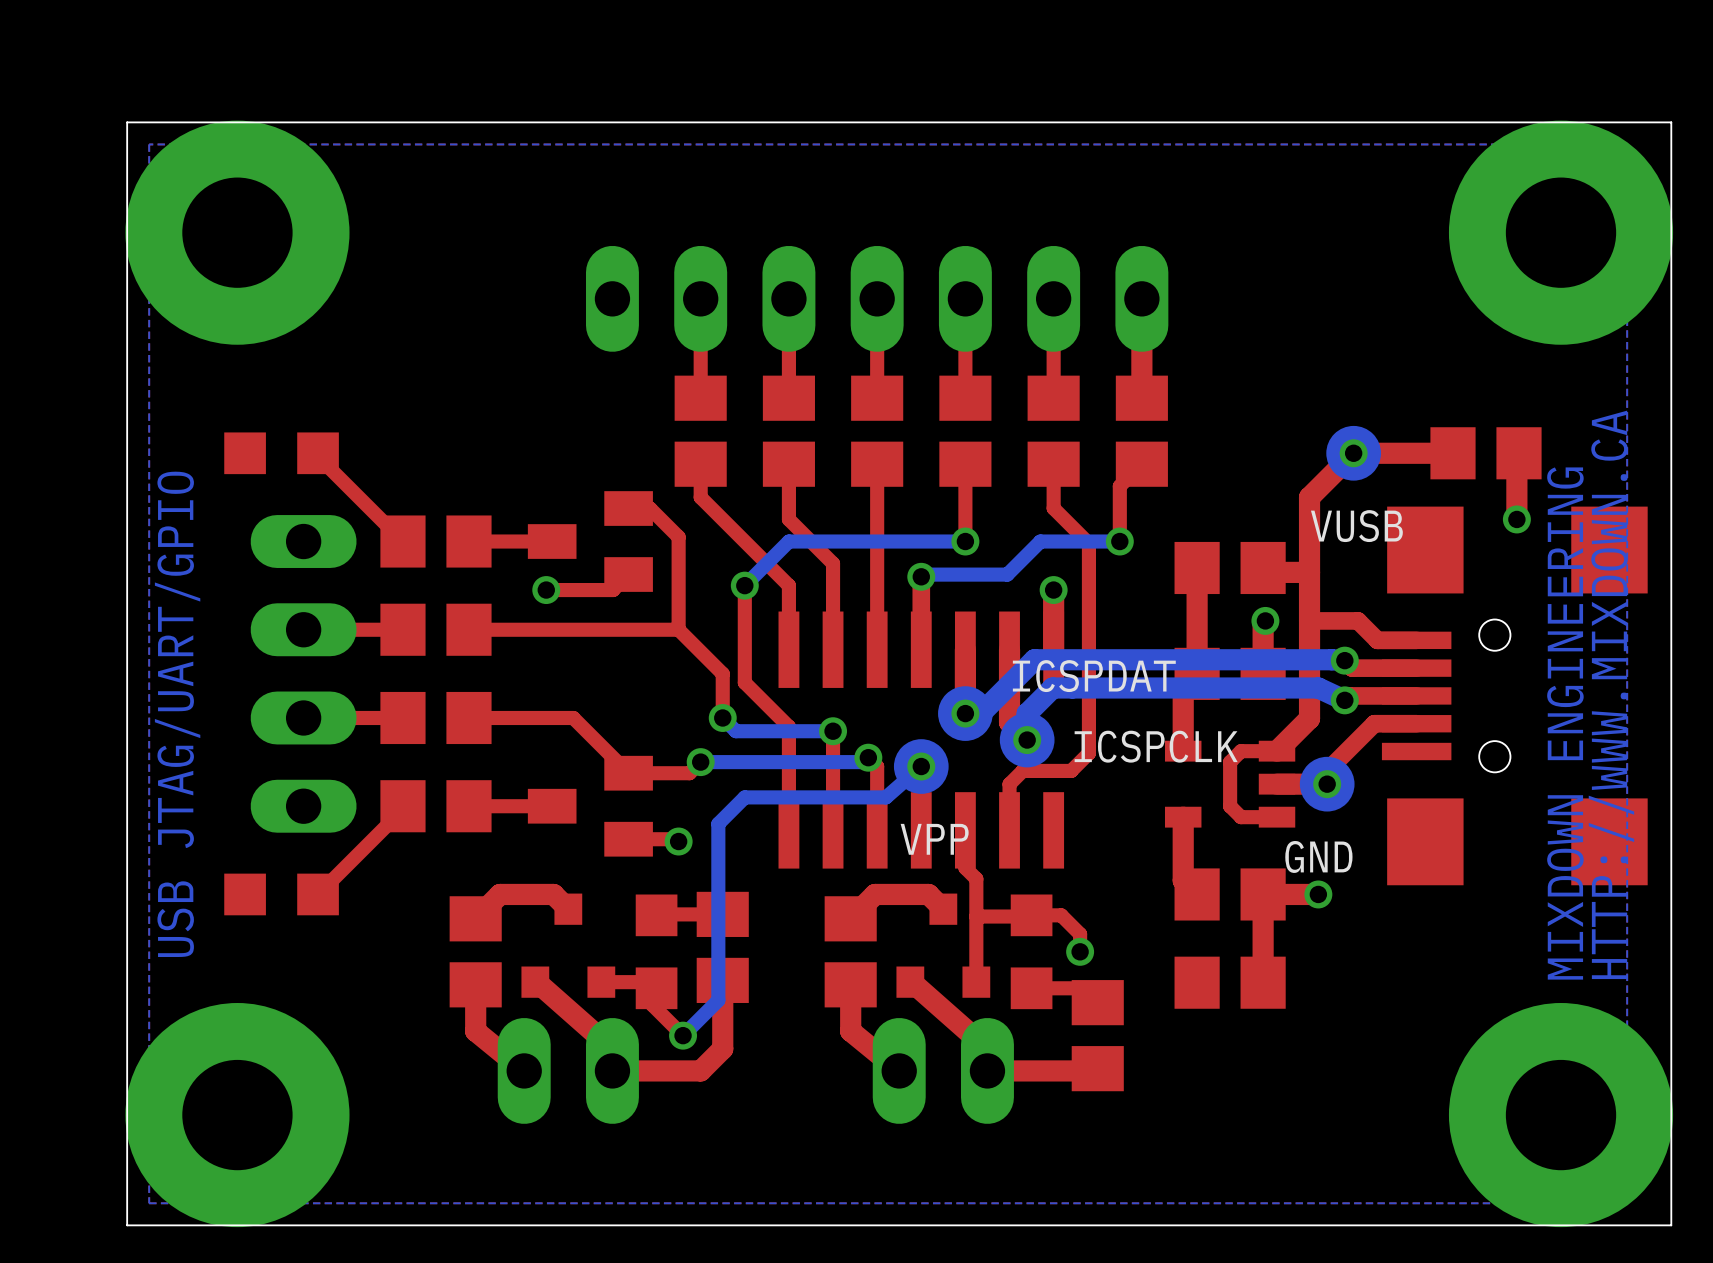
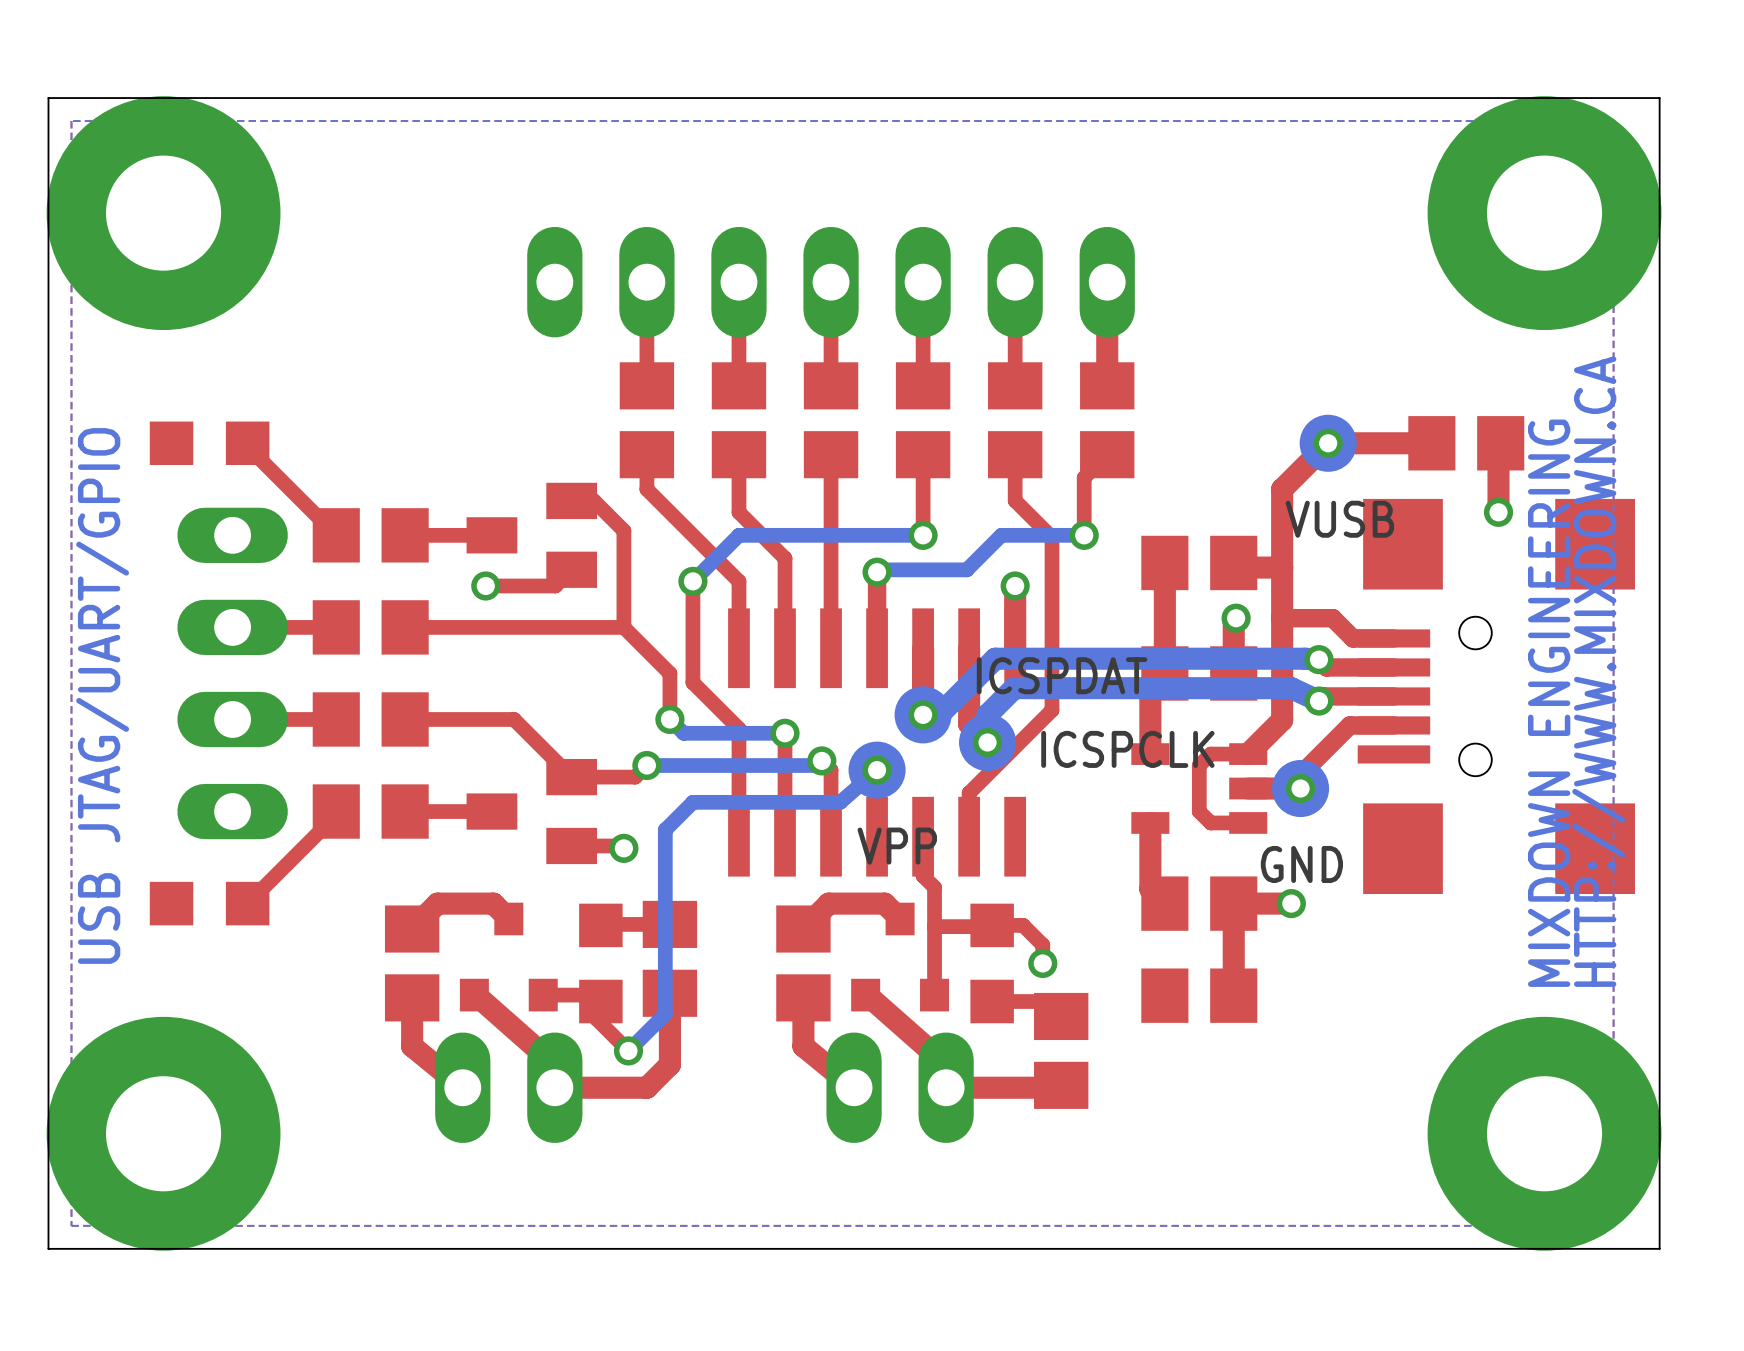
top track: (1088, 709) (1088, 753) (1071, 770) (1022, 770) (1009, 784) (1009, 788) -> (1051, 710) (969, 793)

